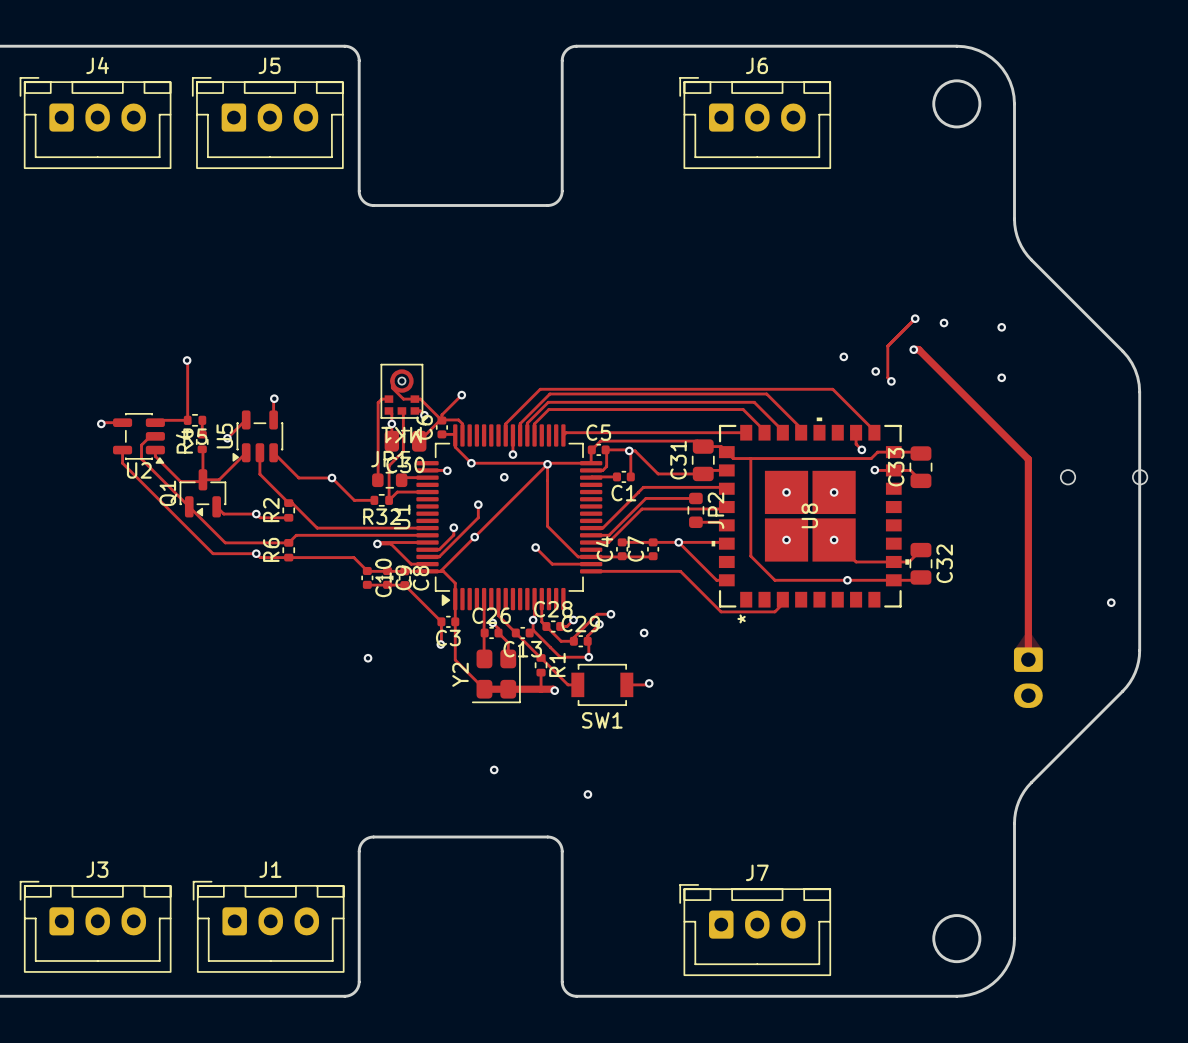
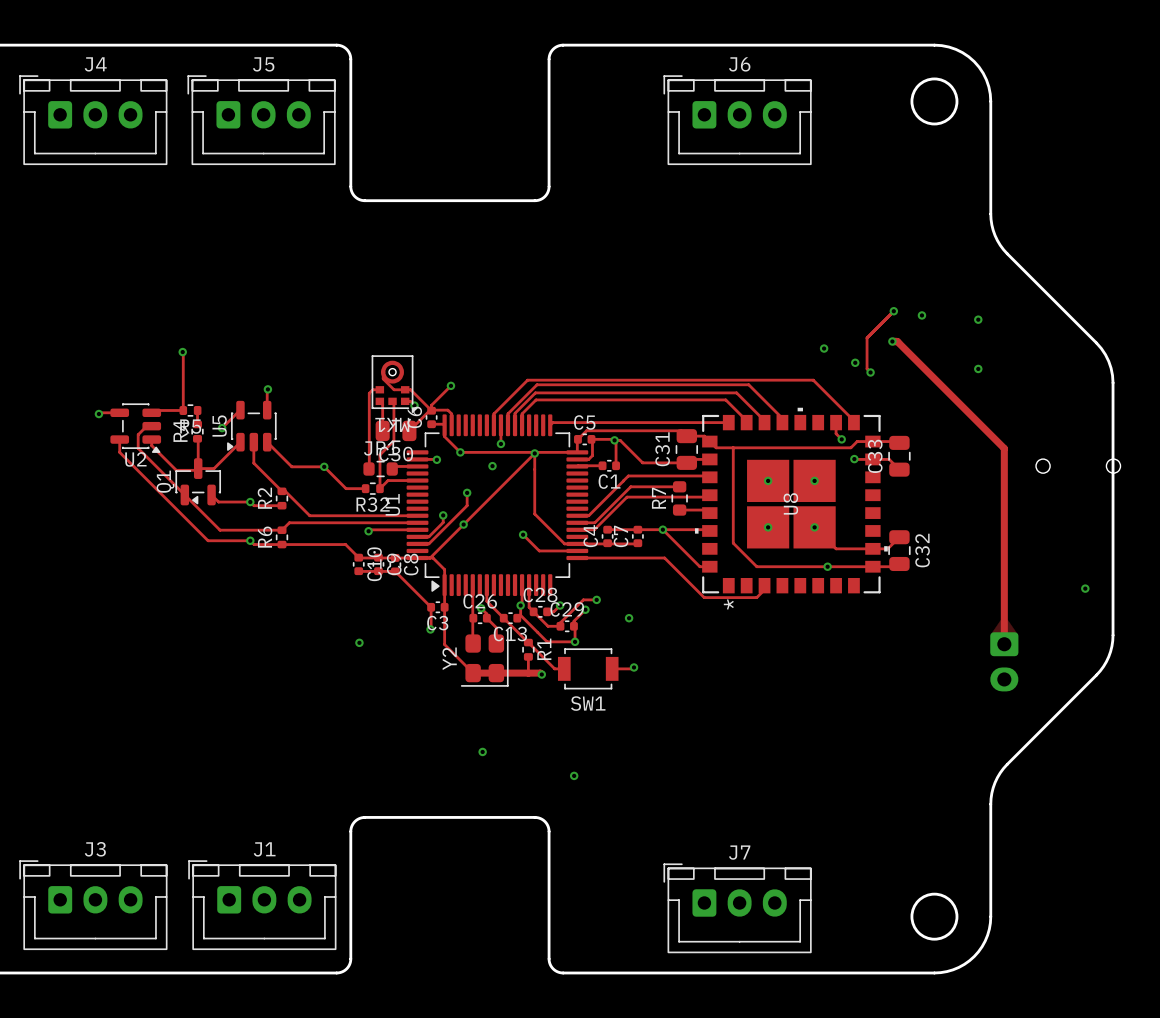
via: (391, 423) -> none
JP2 name: JP2 (715, 510) -> R7 (658, 498)
track: (377, 543) (390, 543) (411, 564) (427, 564) -> none

